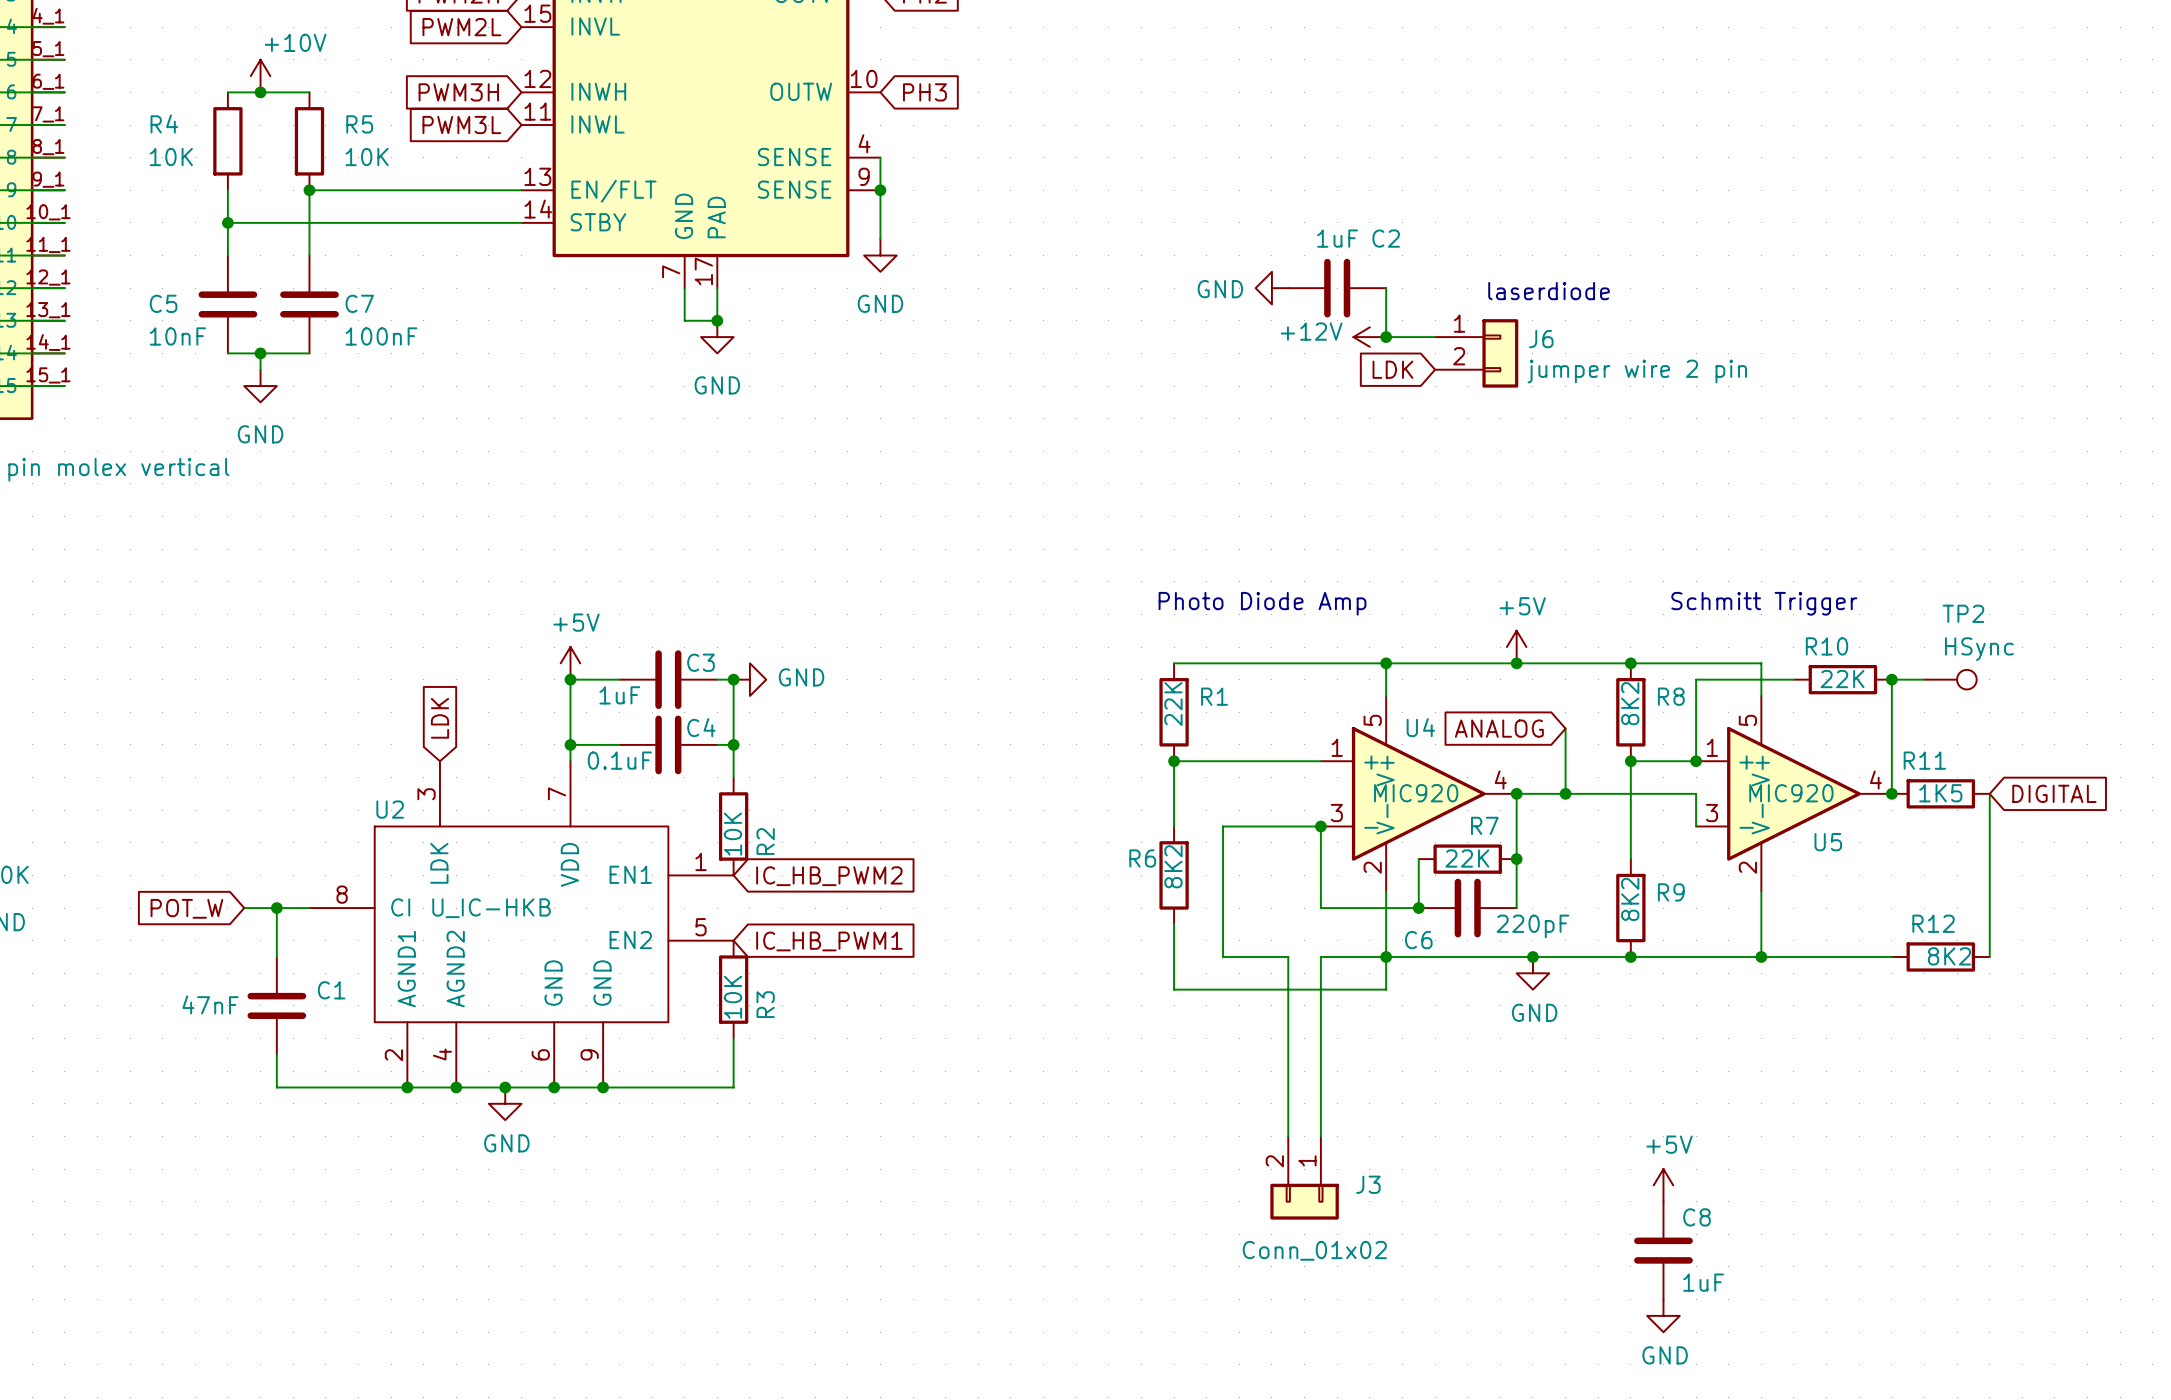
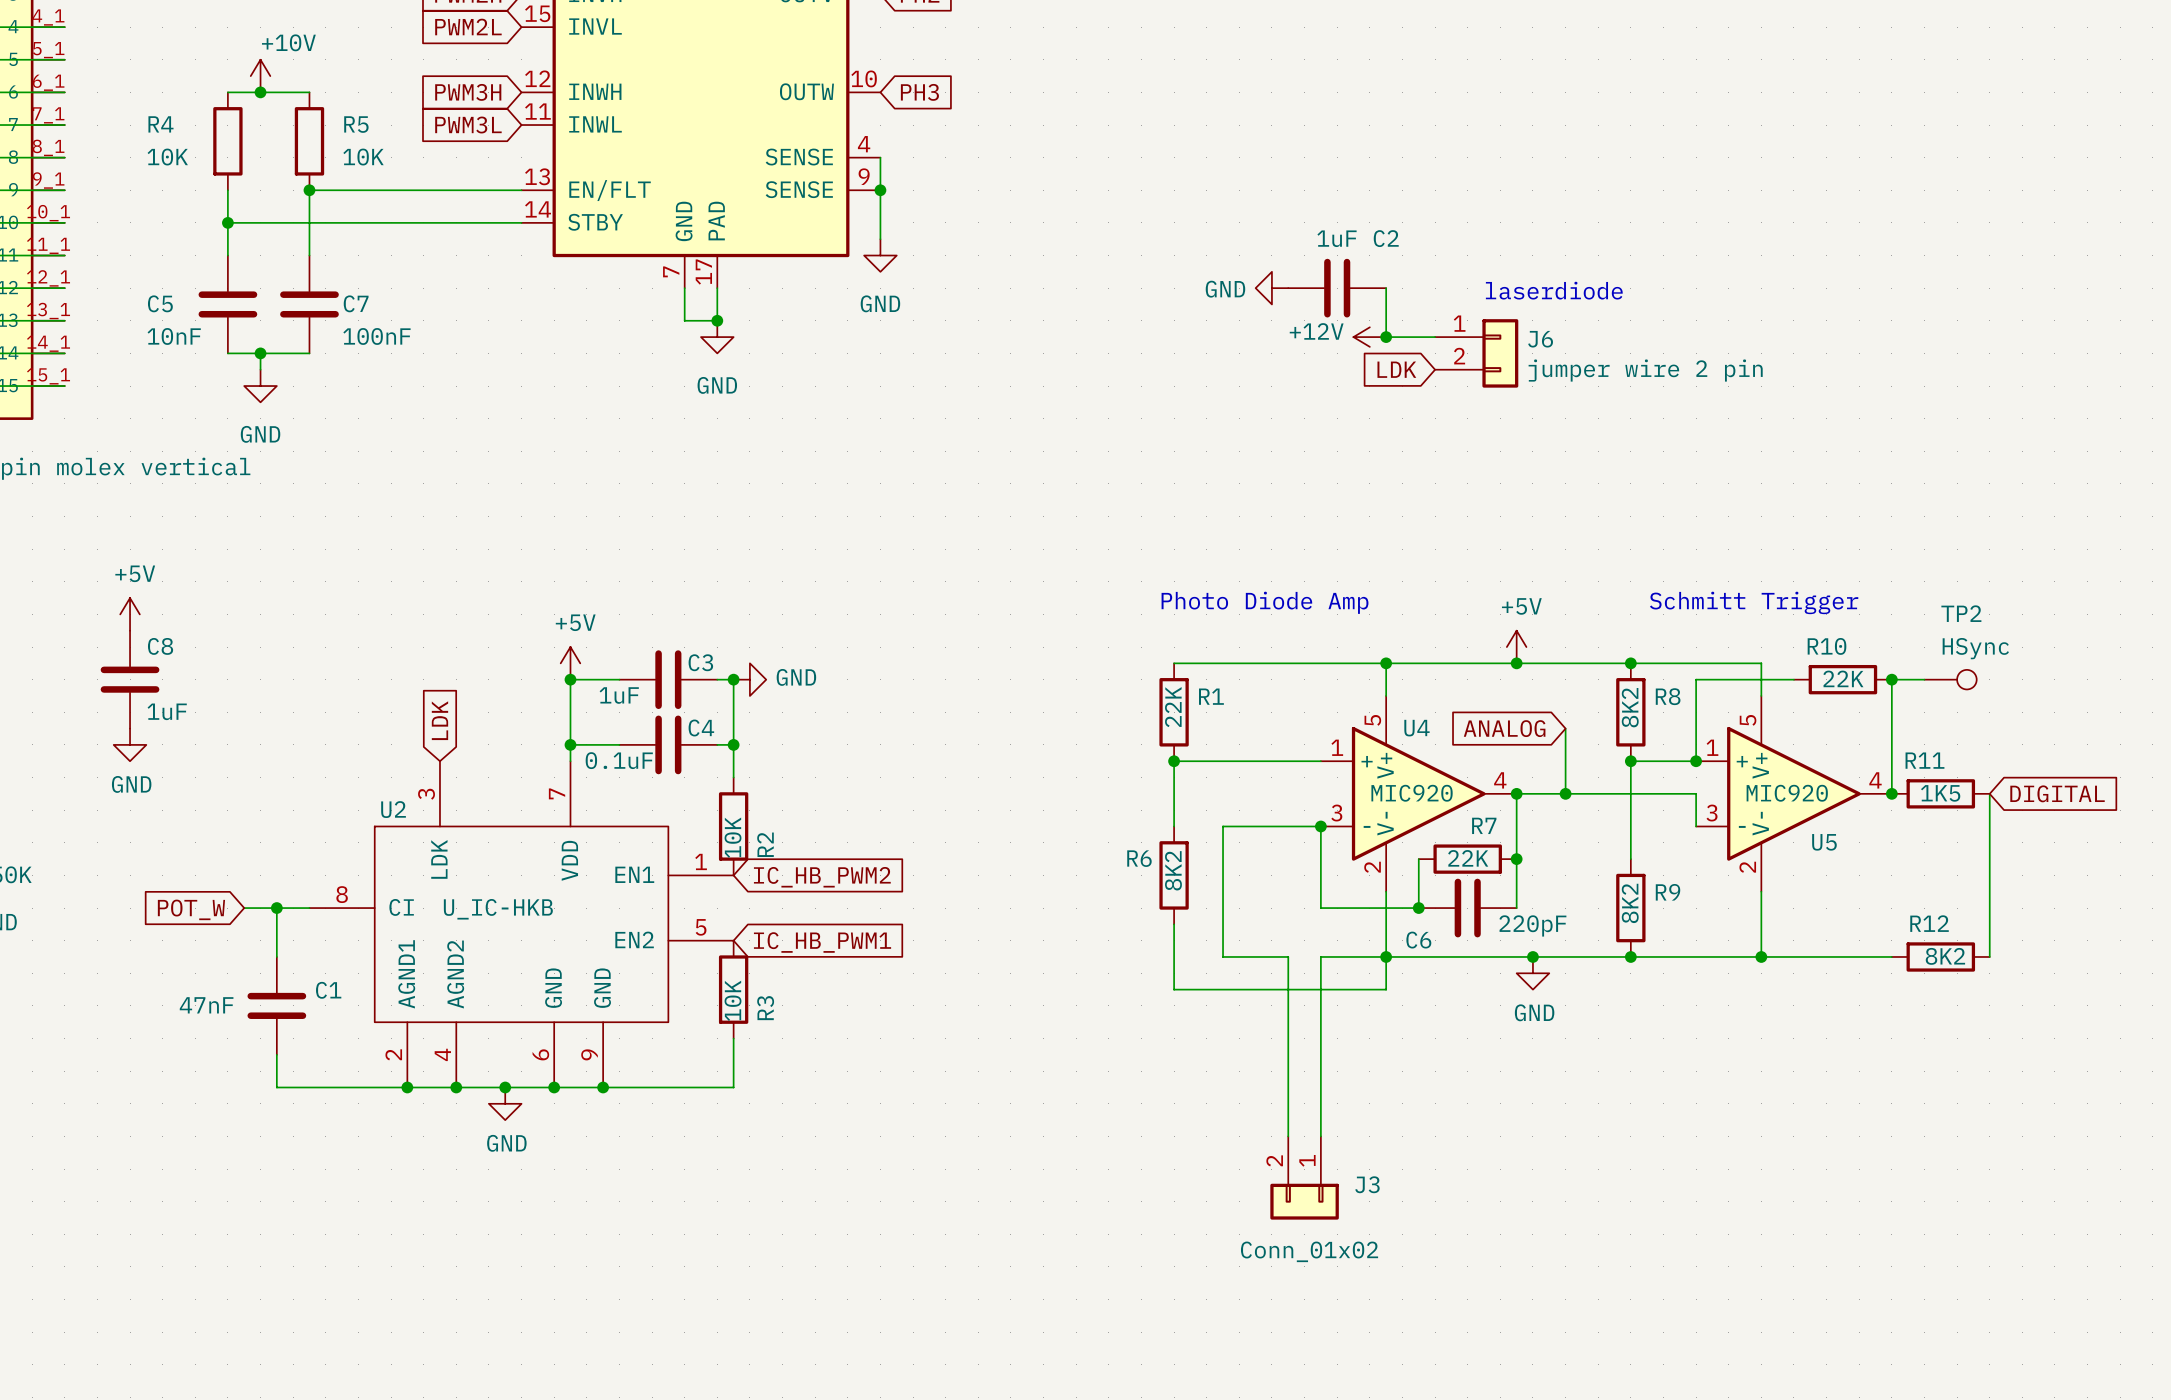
power symbol: none -> +5V (130, 614)
power symbol: none -> GND (130, 744)
power symbol: +5V (1663, 1185) -> none
C8 position: (1663, 1250) -> (130, 679)
power symbol: GND (1663, 1315) -> none

